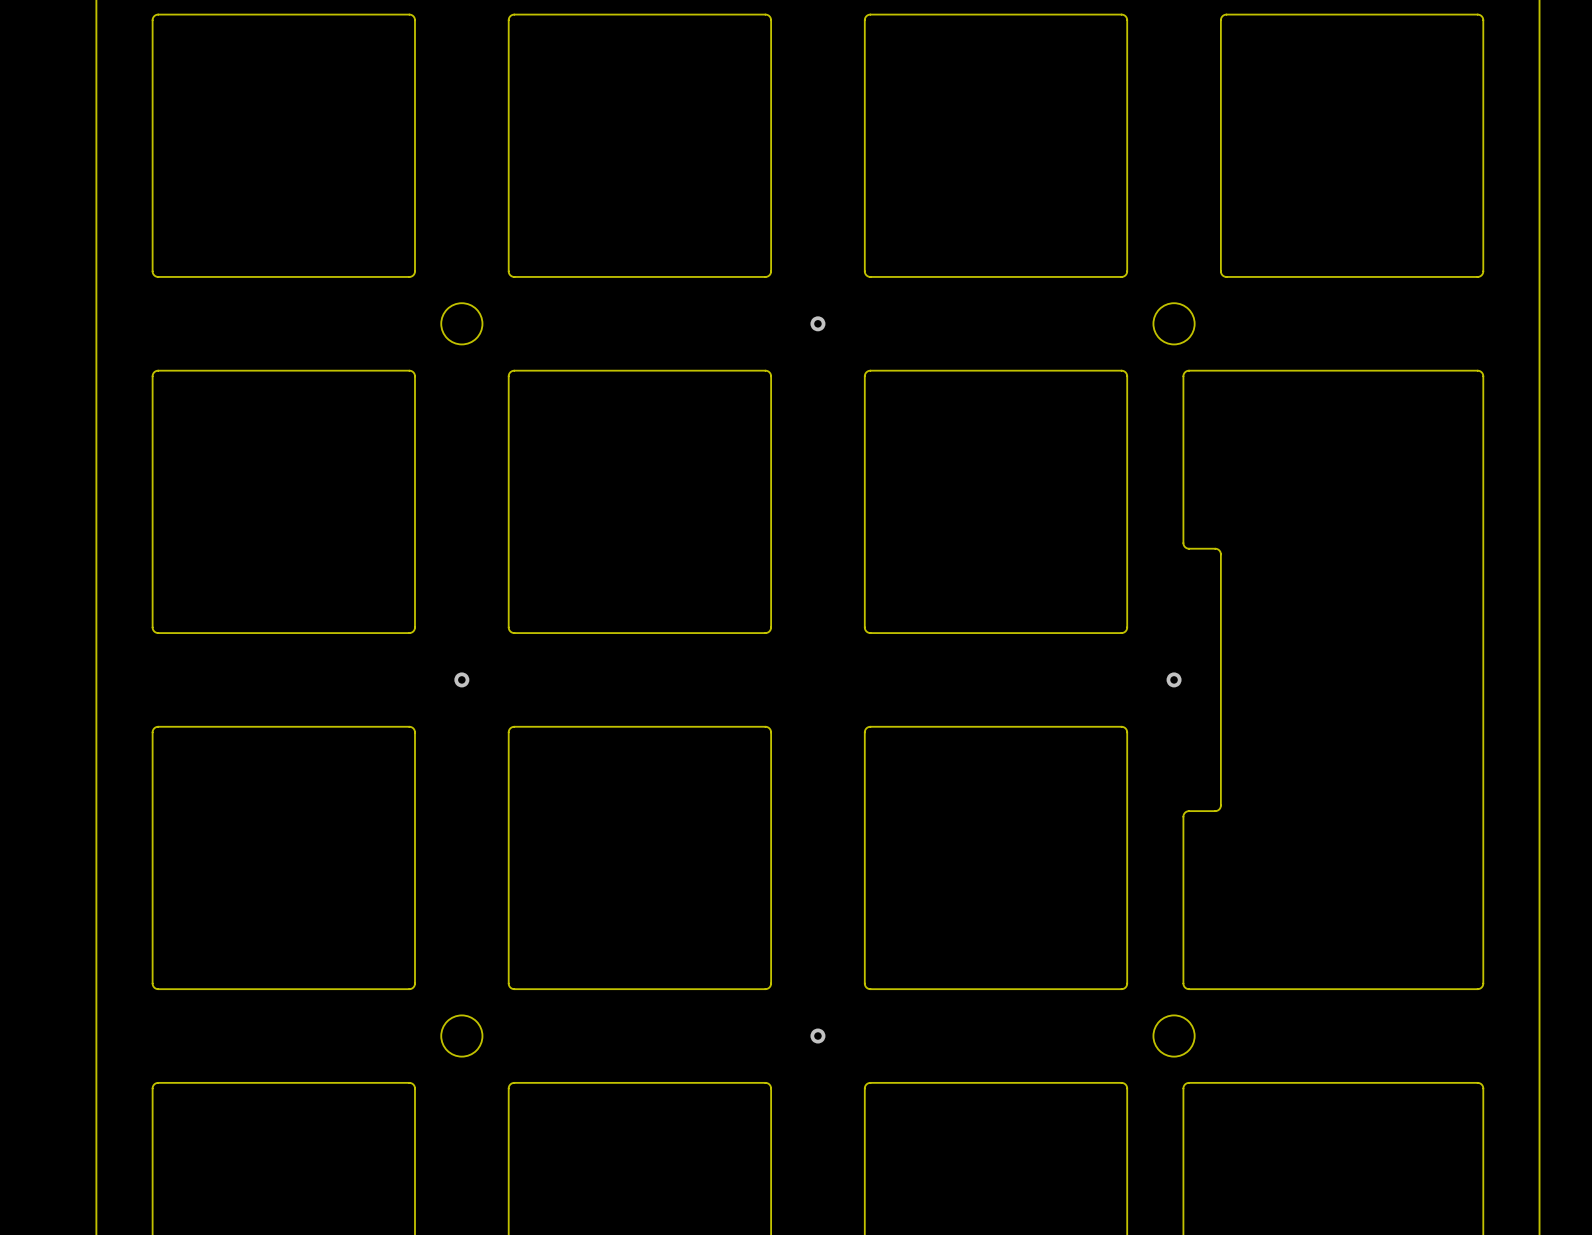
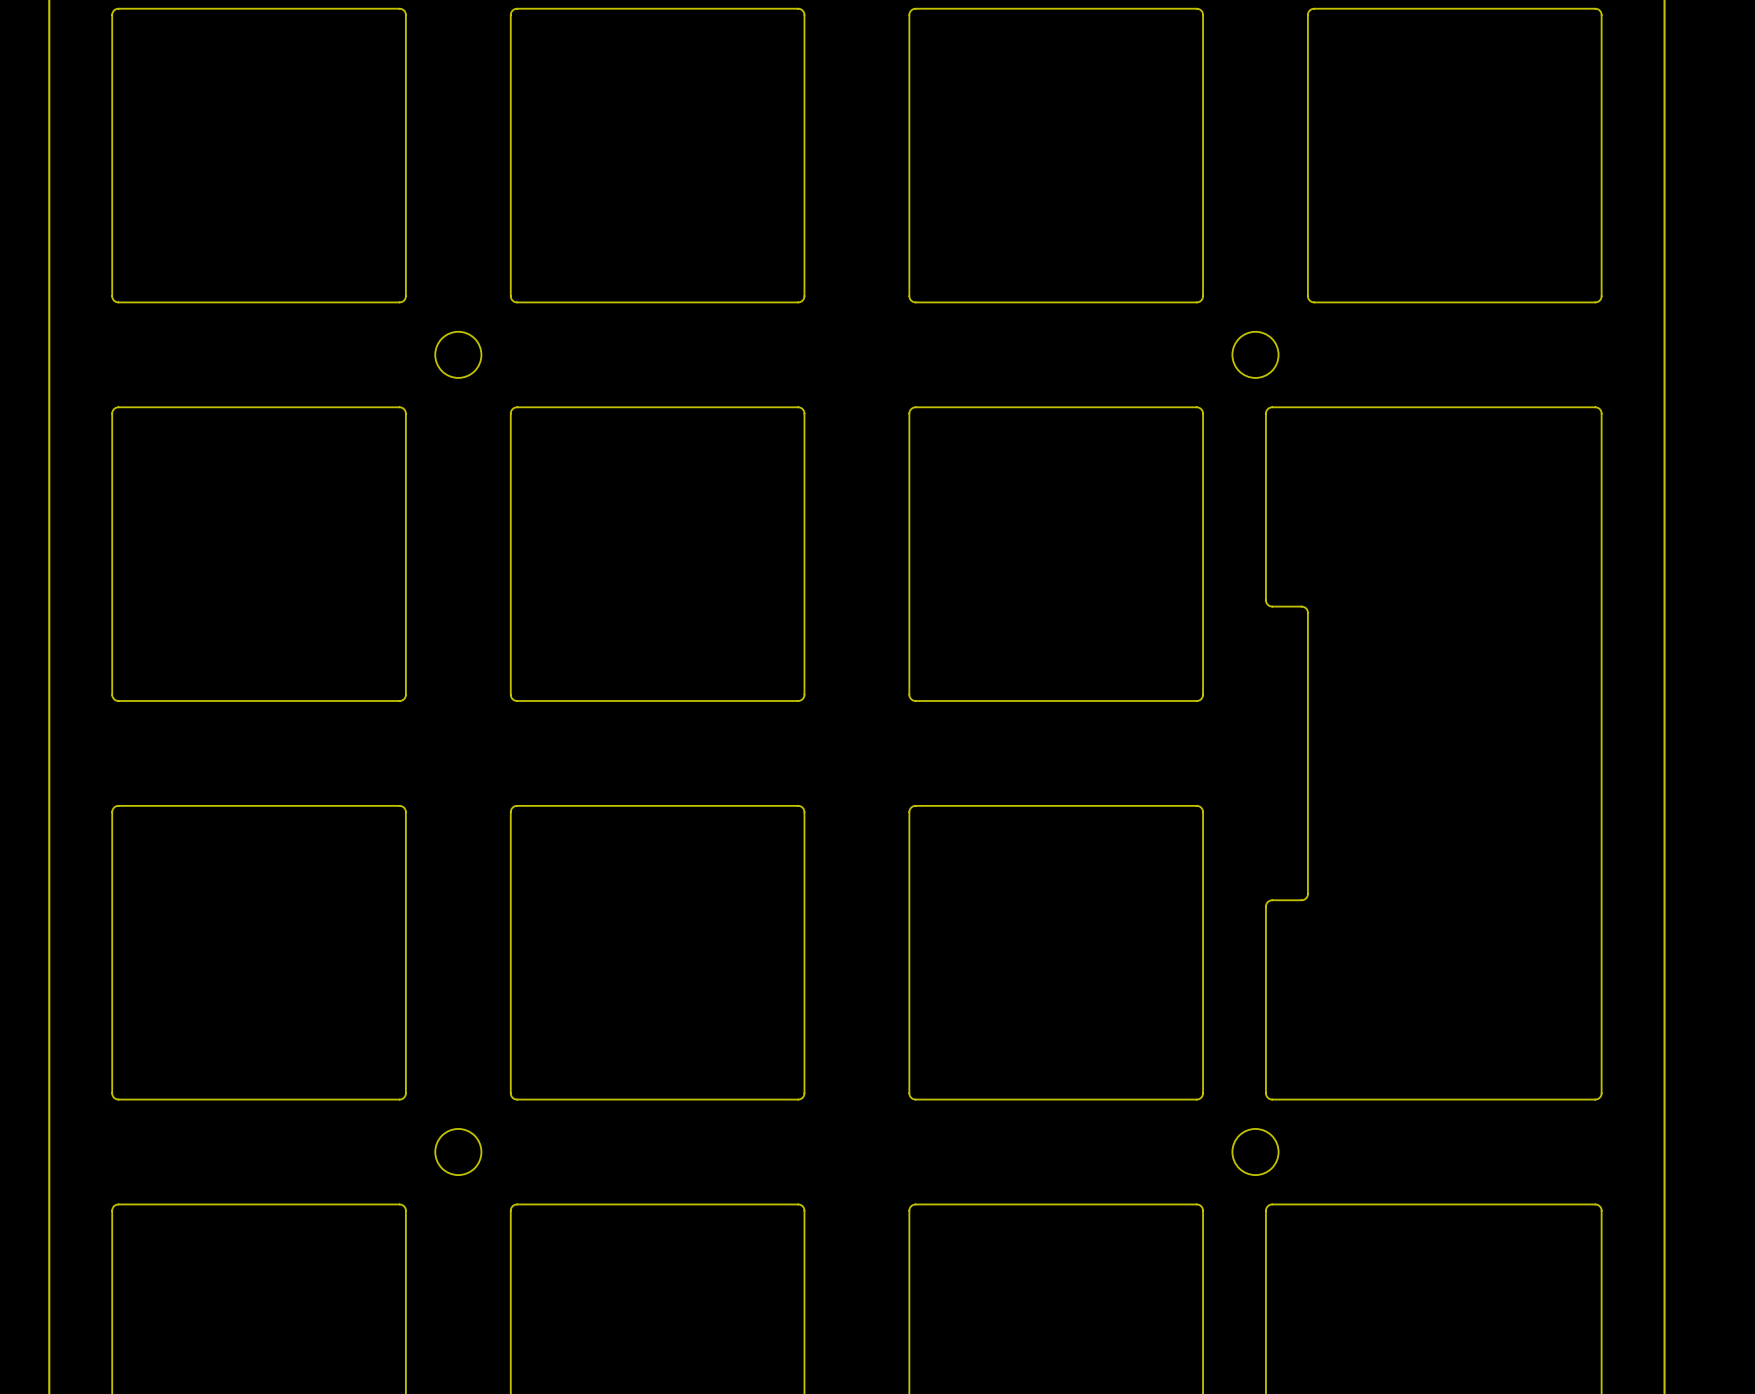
via: (817, 323) -> none
via: (461, 679) -> none
via: (1174, 679) -> none
via: (817, 1036) -> none

